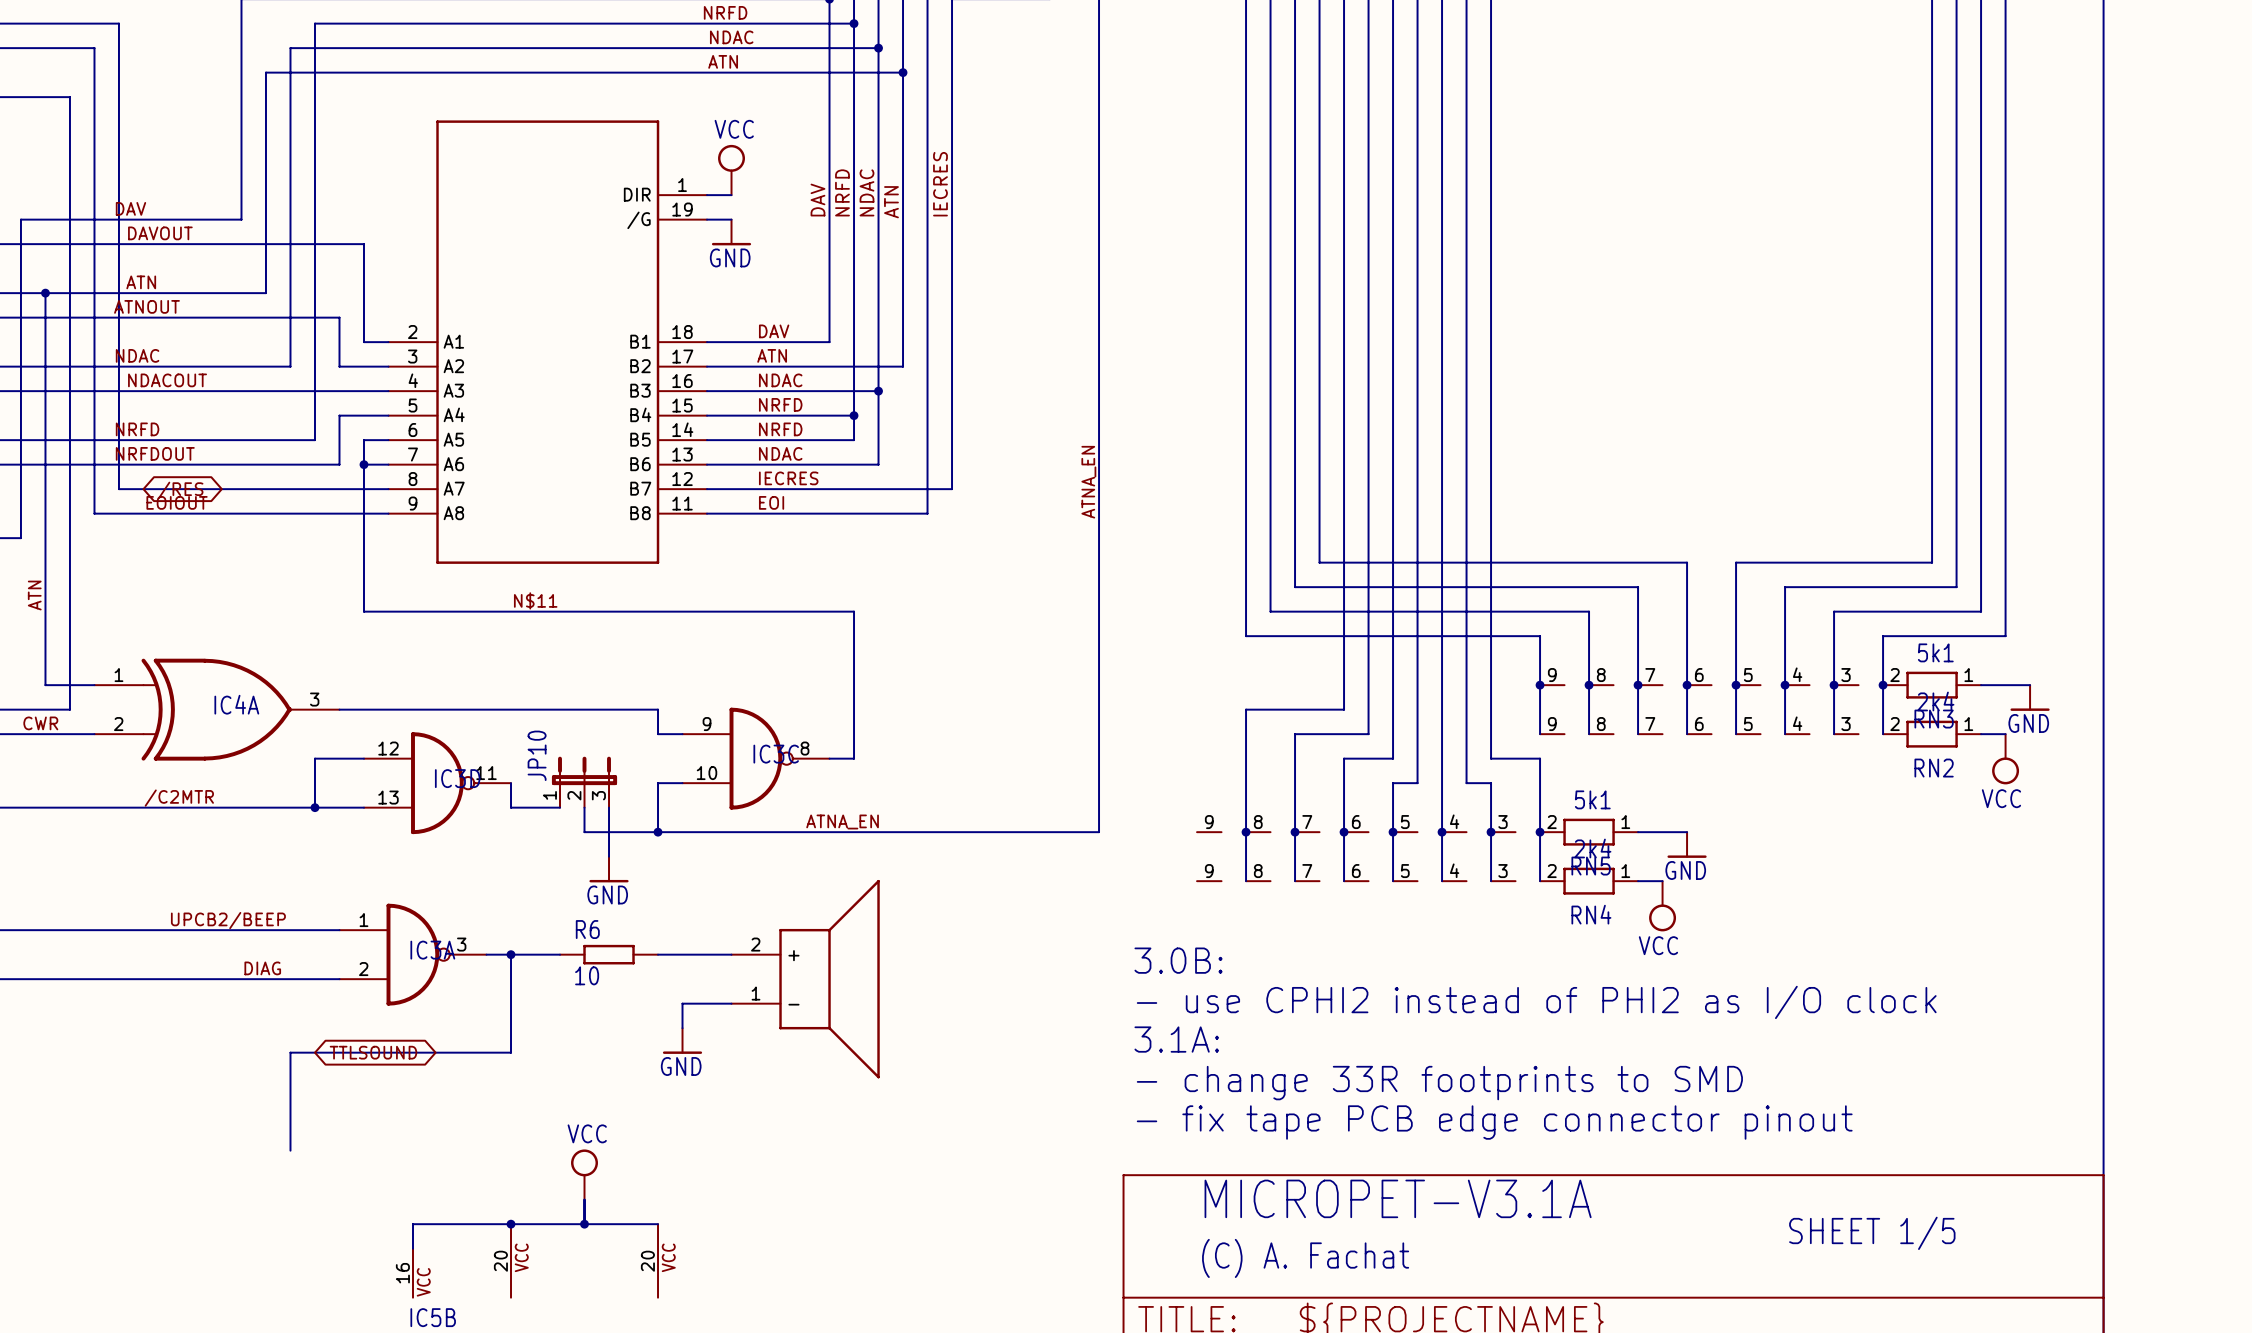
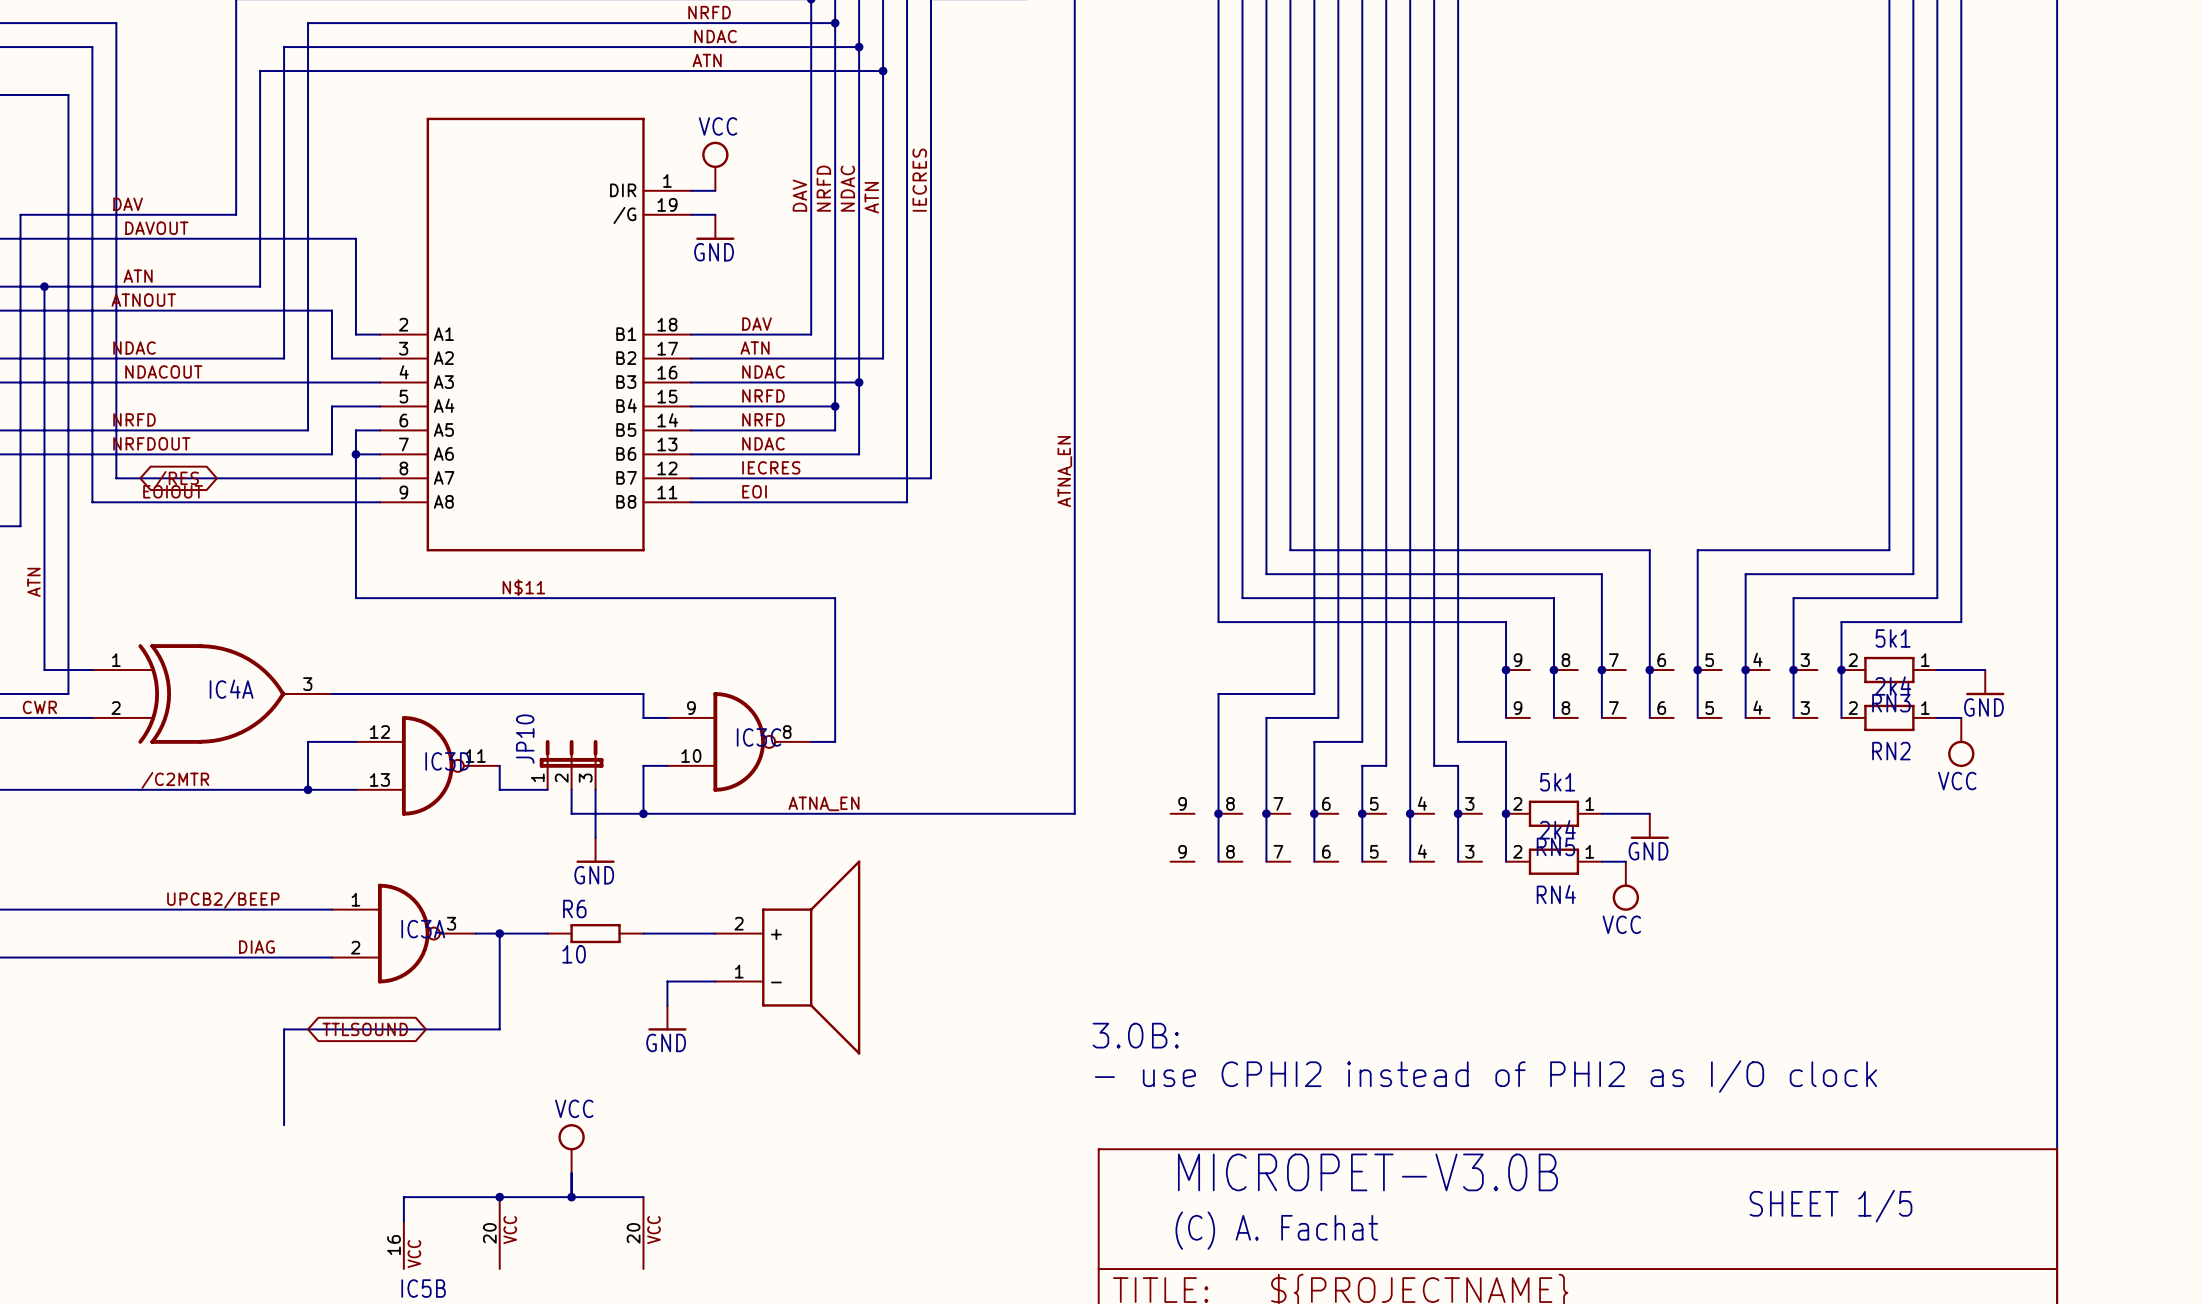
text position: 3.0B: (1178, 960) -> 3.0B: (1135, 1035)
text position: - use CPHI2 instead of PHI2 as I/O clock (1536, 1002) -> - use CPHI2 instead of PHI2 as I/O clock (1485, 1076)
text: 3.1A: (1176, 1039) -> none
text: - change 33R footprints to SMD (1439, 1083) -> none
text: - fix tape PCB edge connector pinout (1494, 1122) -> none
text: MICROPET-V3.1A (1398, 1198) -> MICROPET-V3.0B (1367, 1172)

